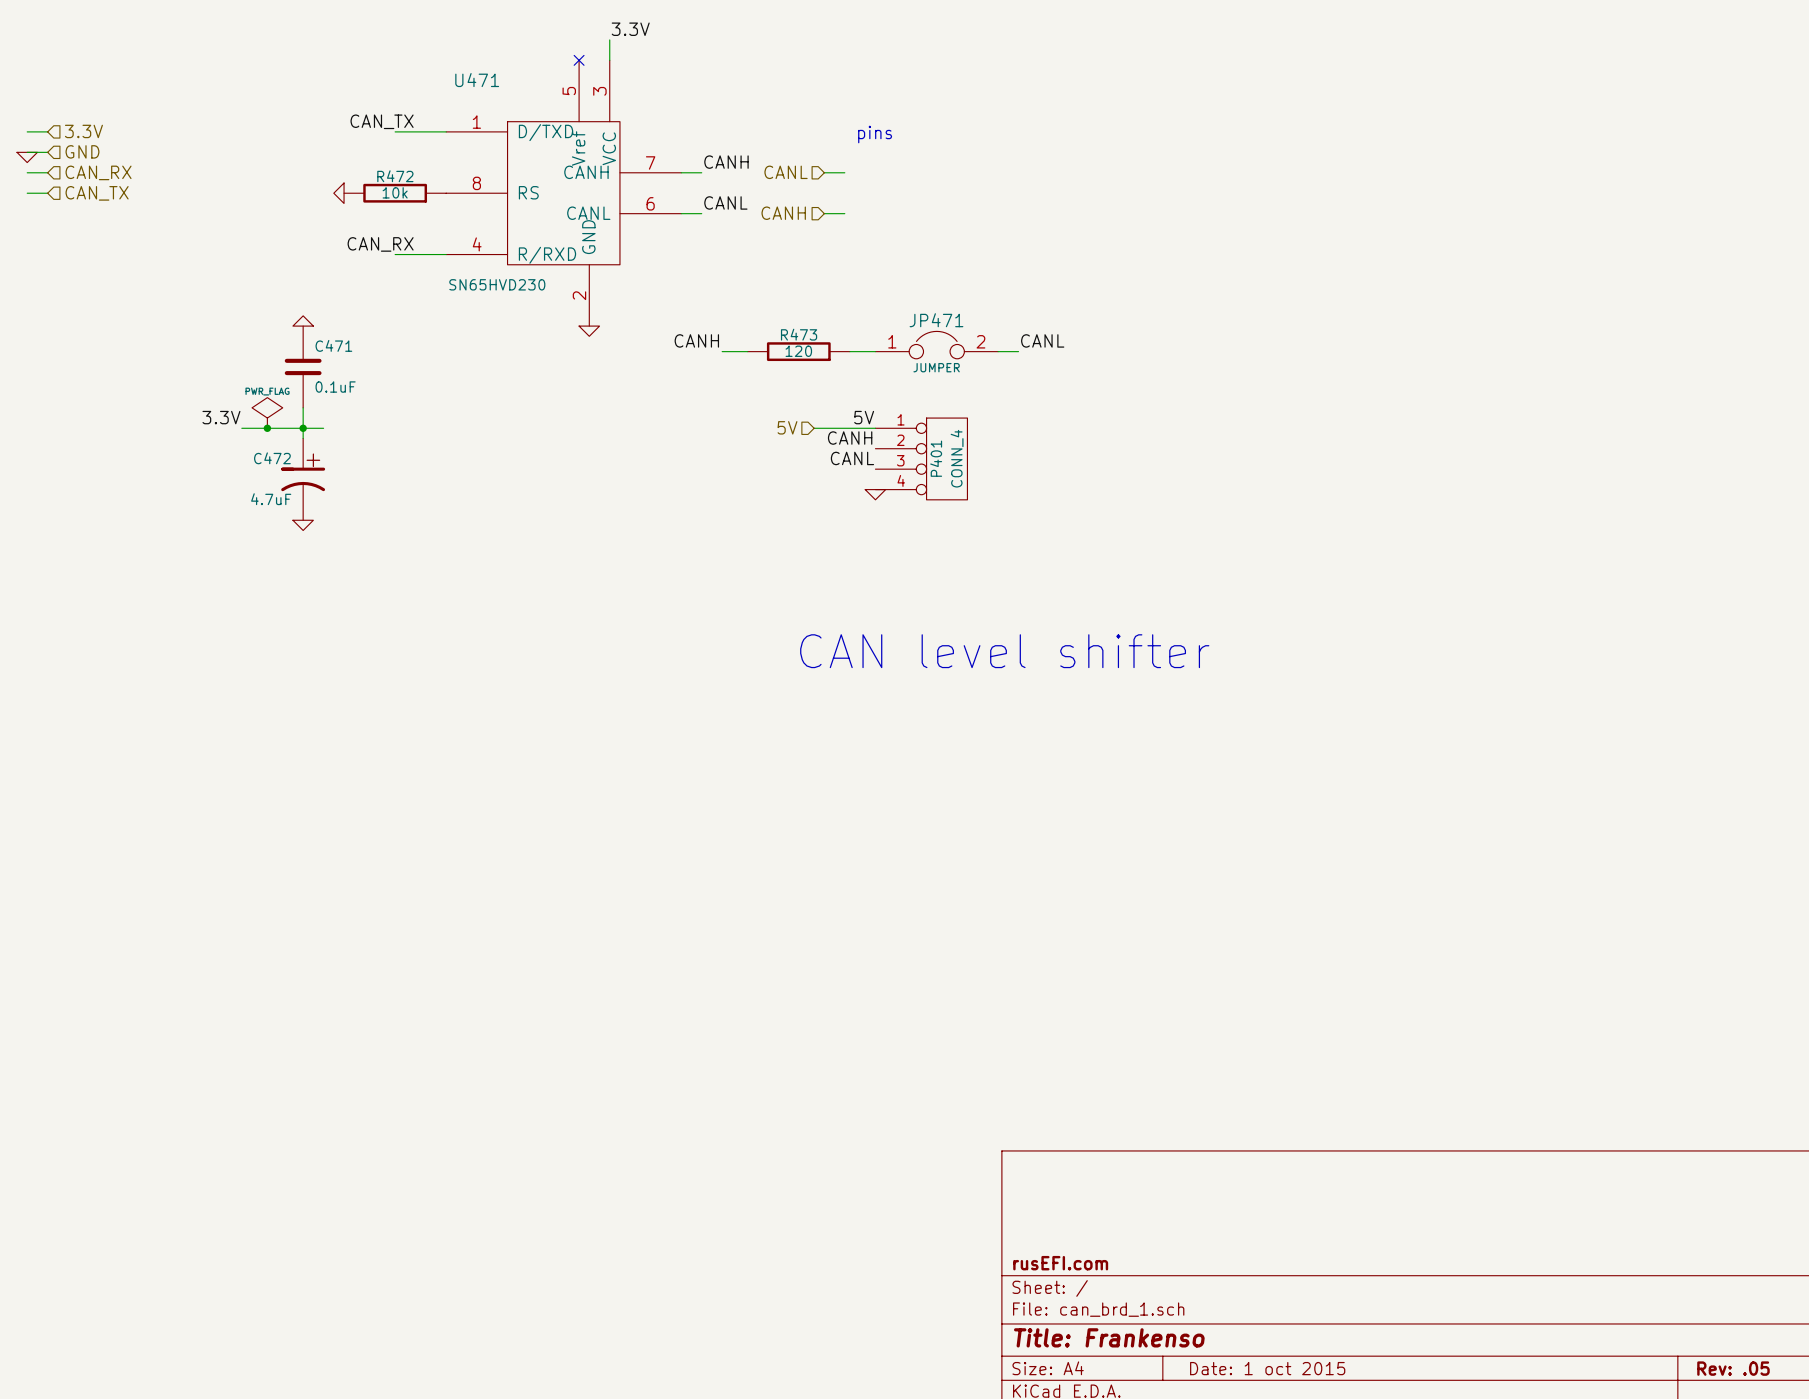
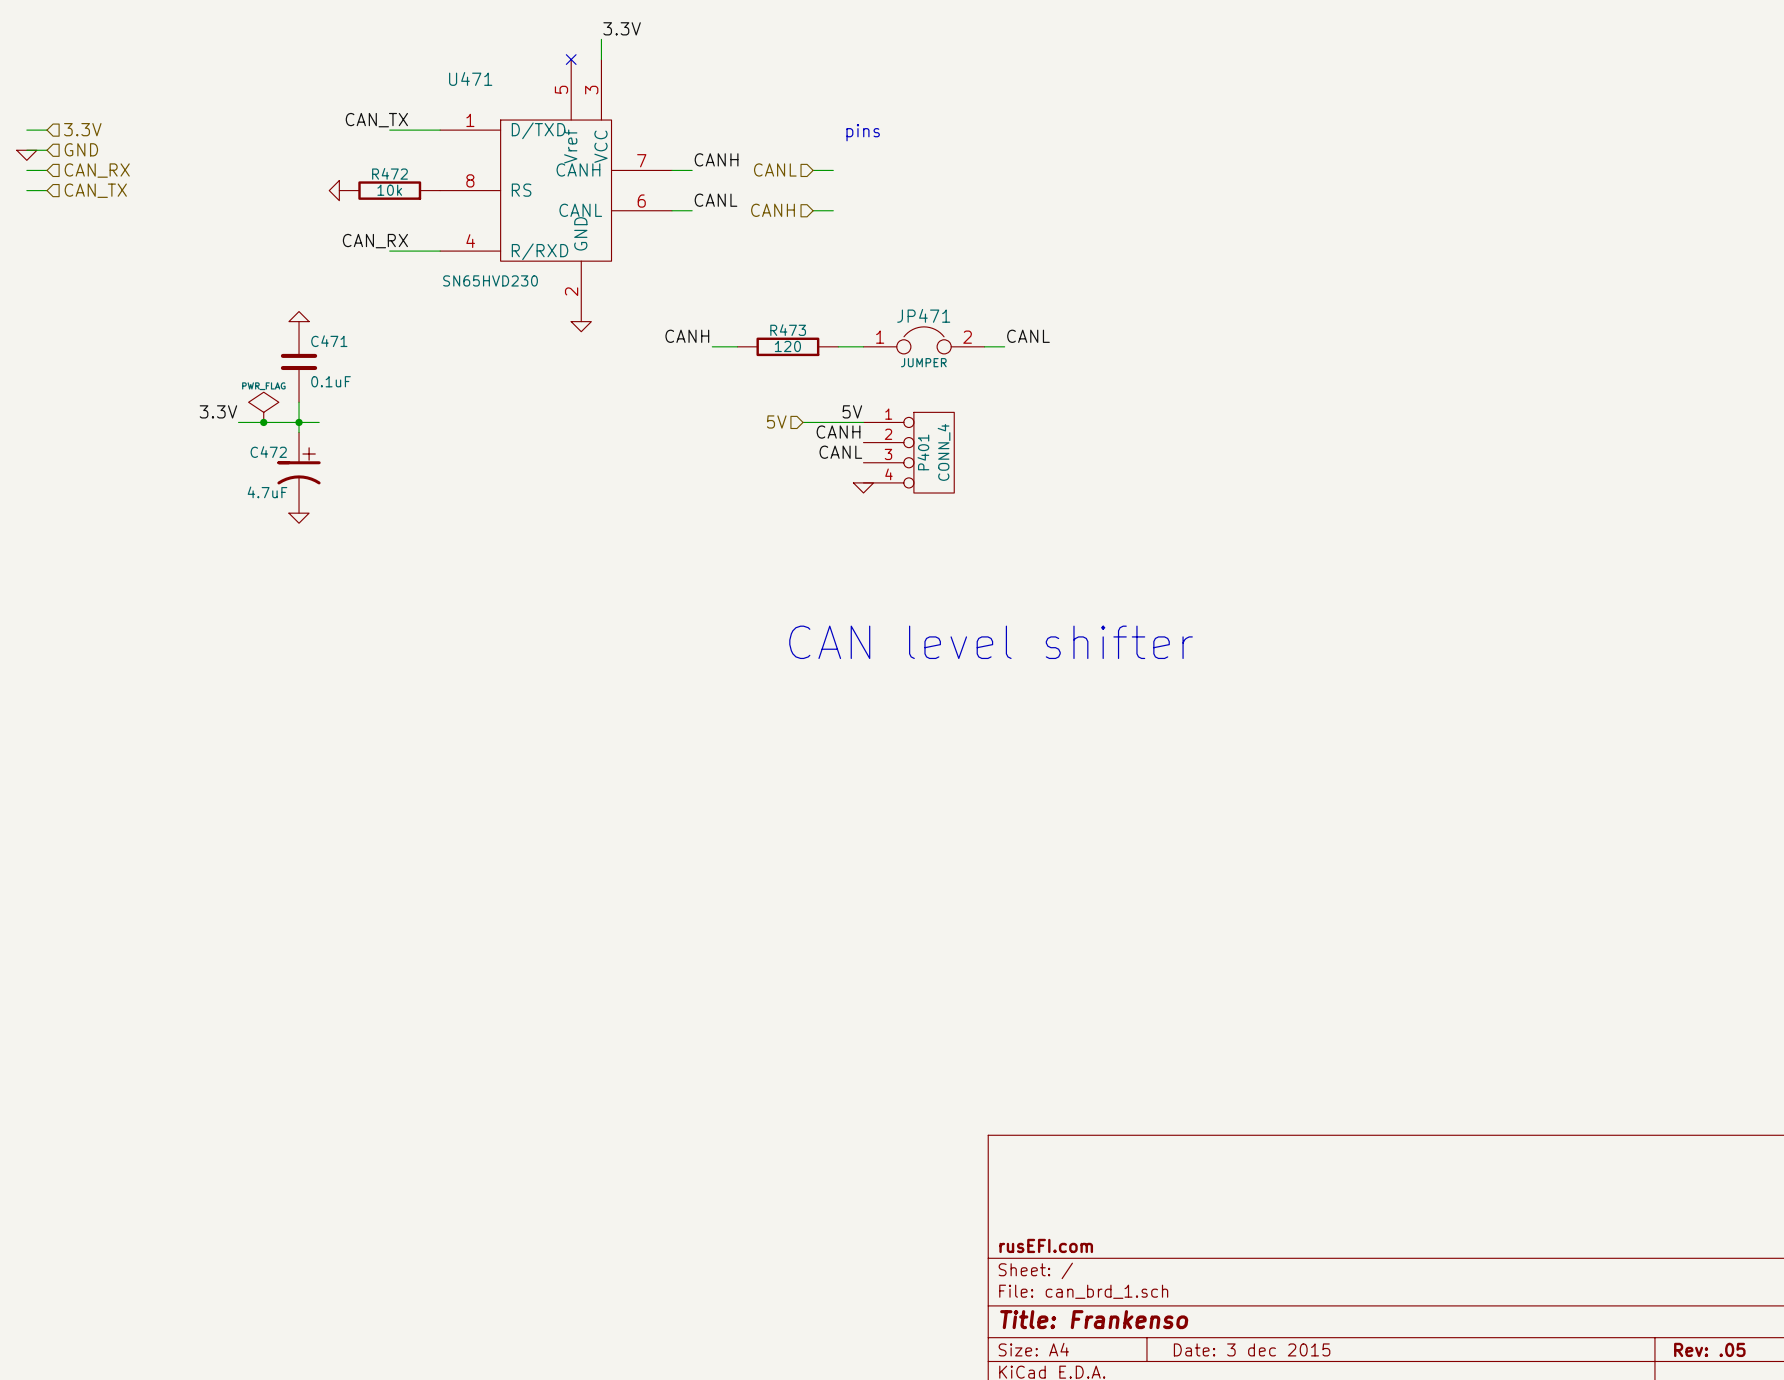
title block: Date: 1 oct 2015 (1267, 1368) -> Date: 3 dec 2015 (1252, 1349)

